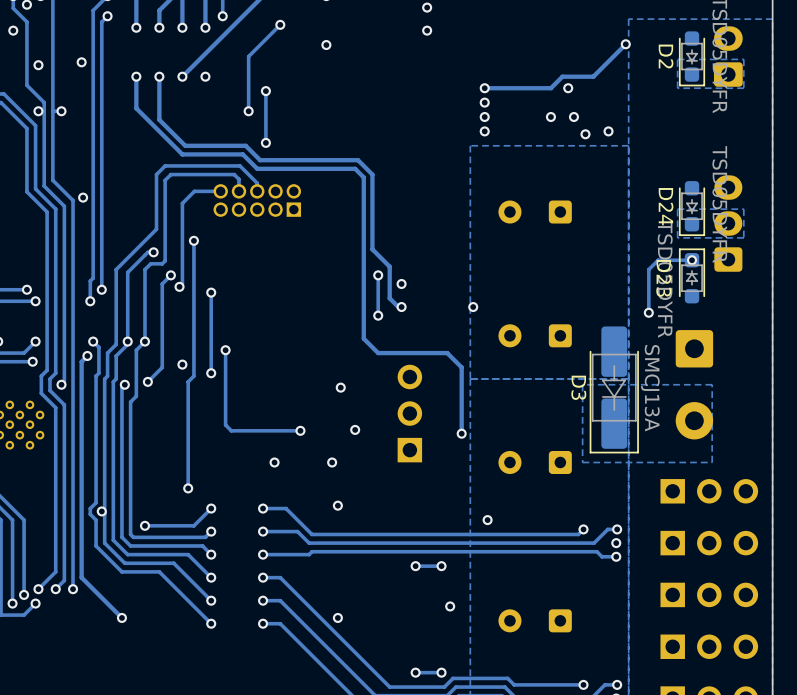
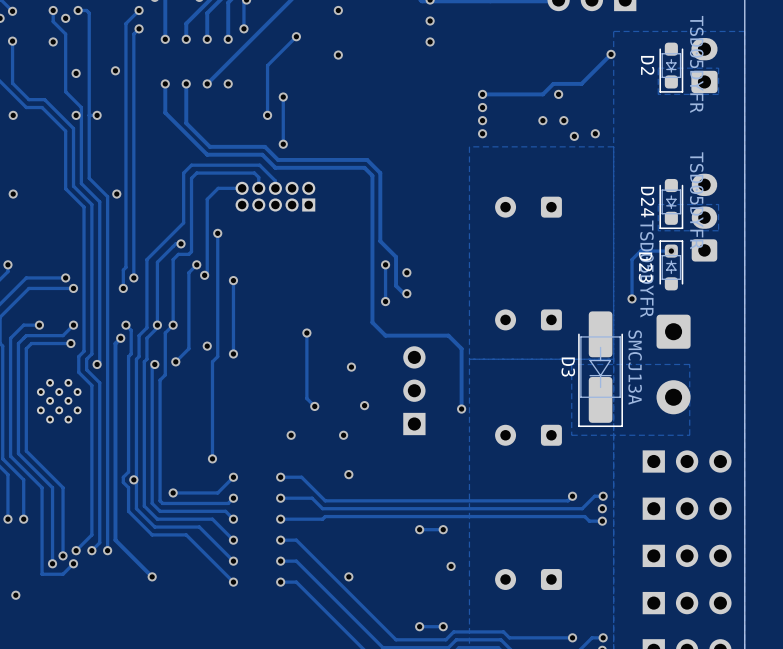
via: (473, 307) -> none
track: (225, 350) (225, 425) (231, 430) (300, 430) -> (306, 333) (306, 398) (314, 406)
via position: (225, 350) -> (306, 333)
via: (487, 520) -> none

